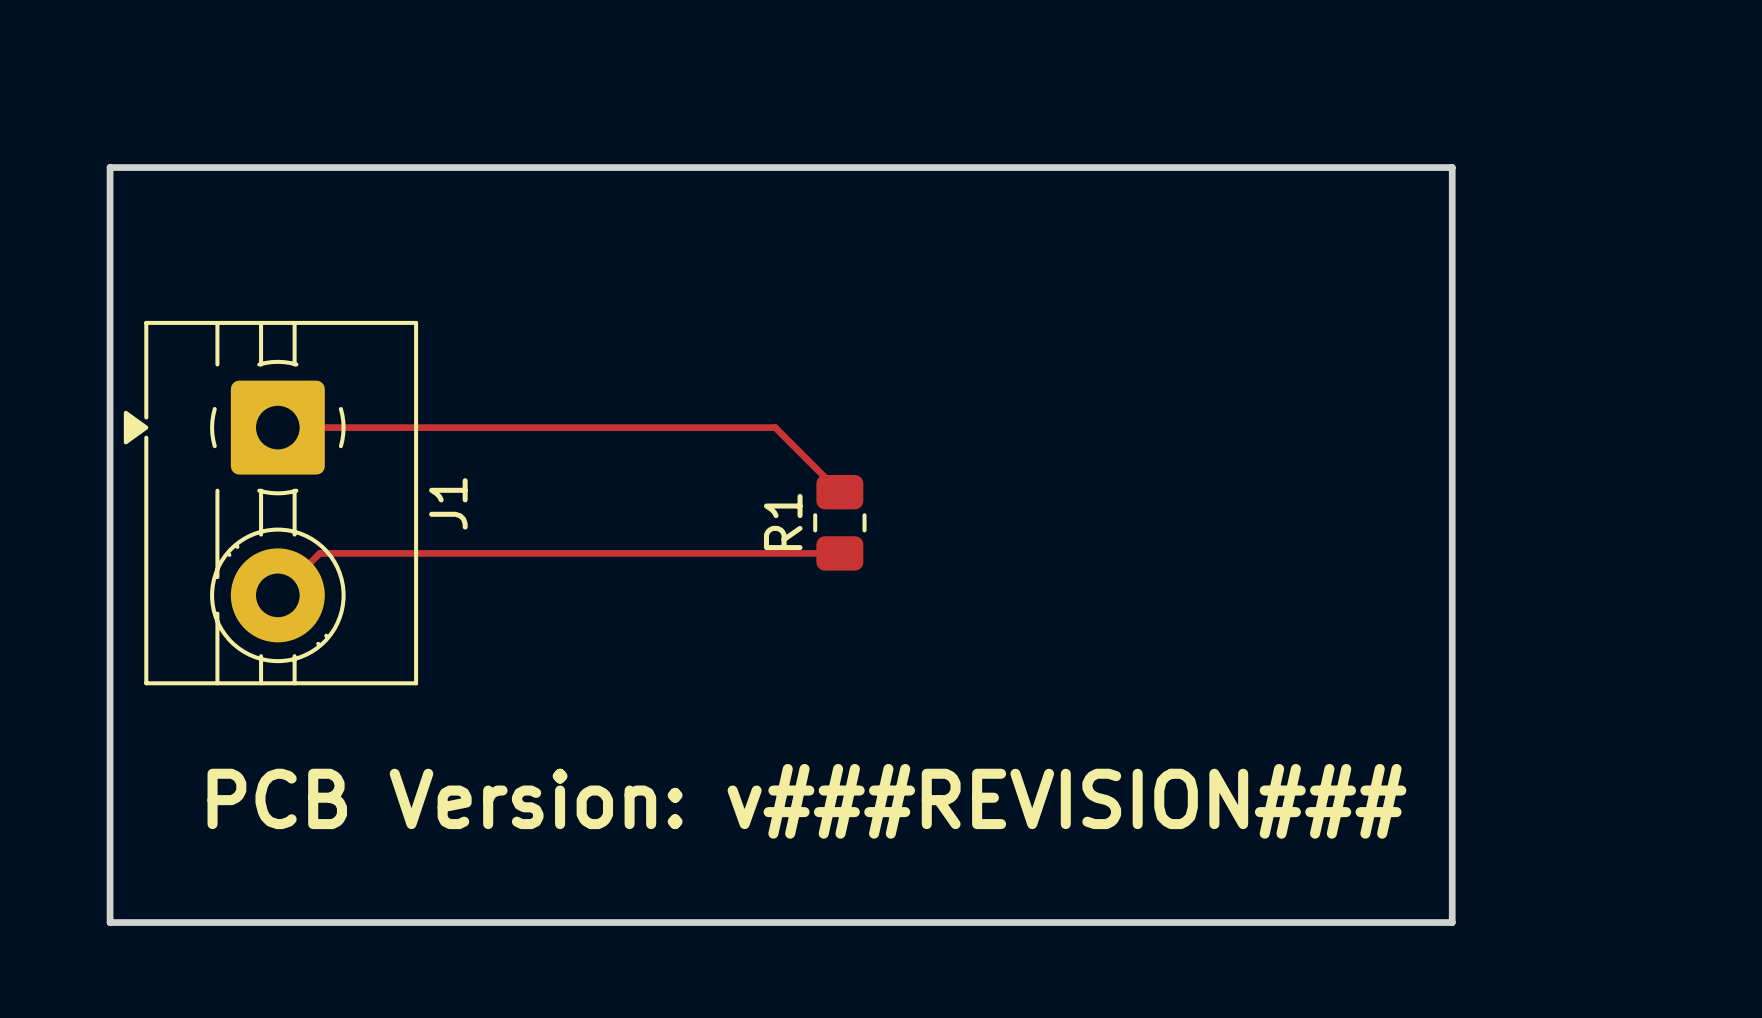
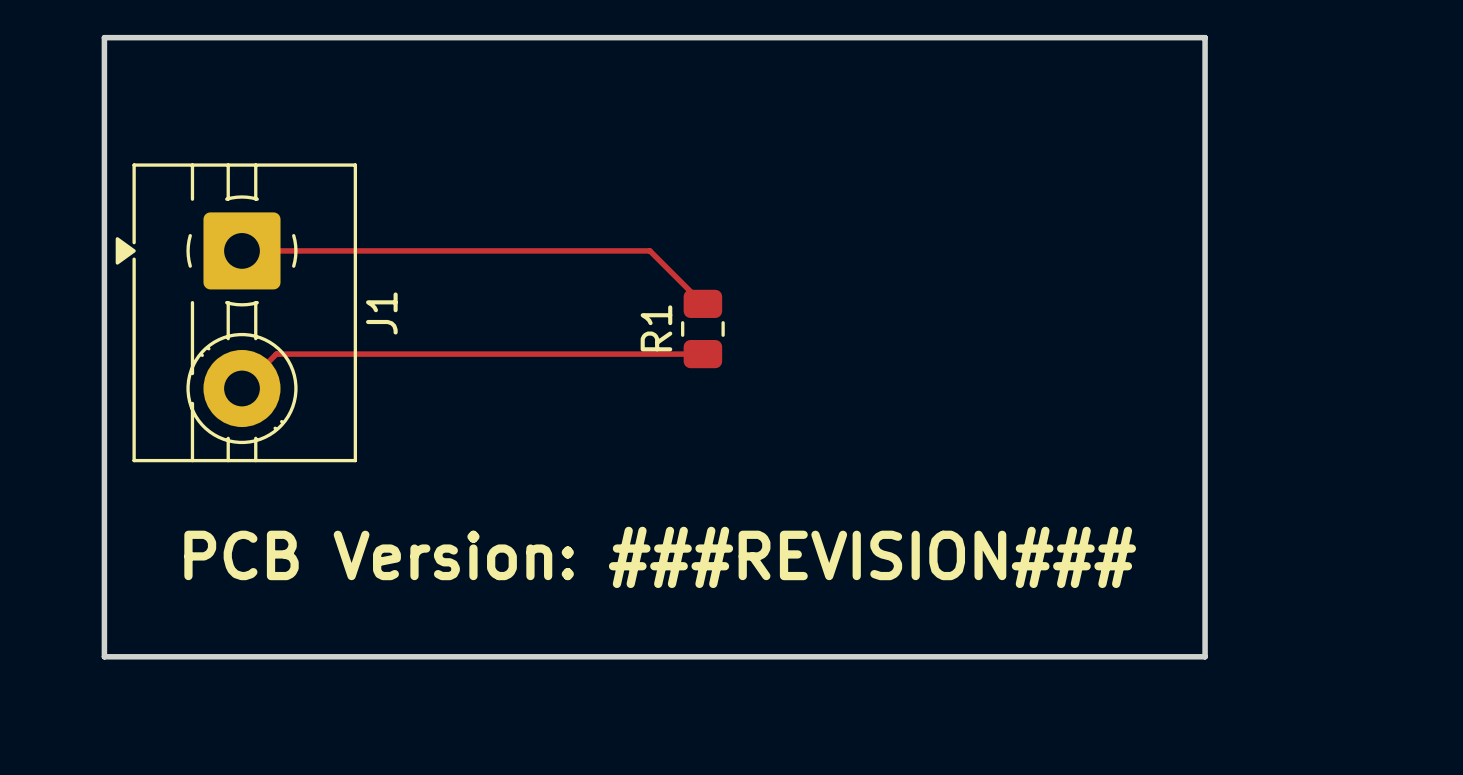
text: PCB Version: v###REVISION### (806, 801) -> PCB Version: ###REVISION### (660, 557)

